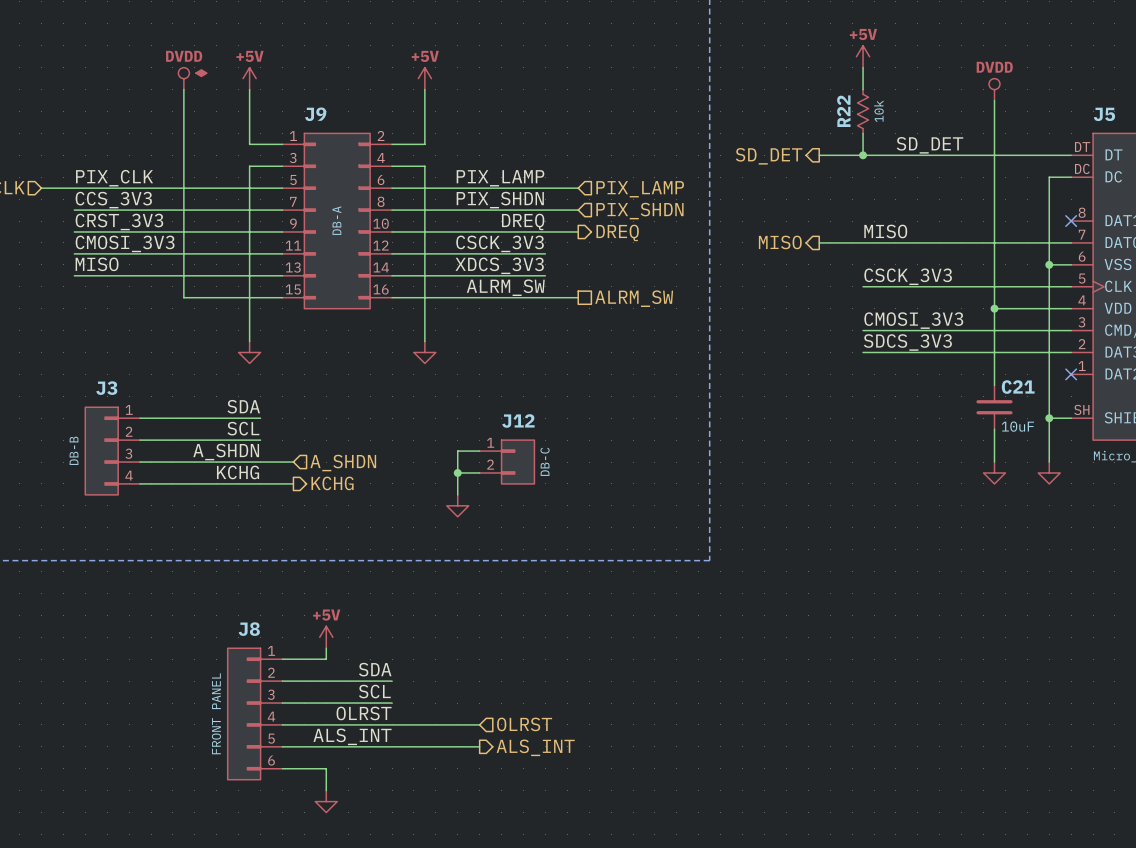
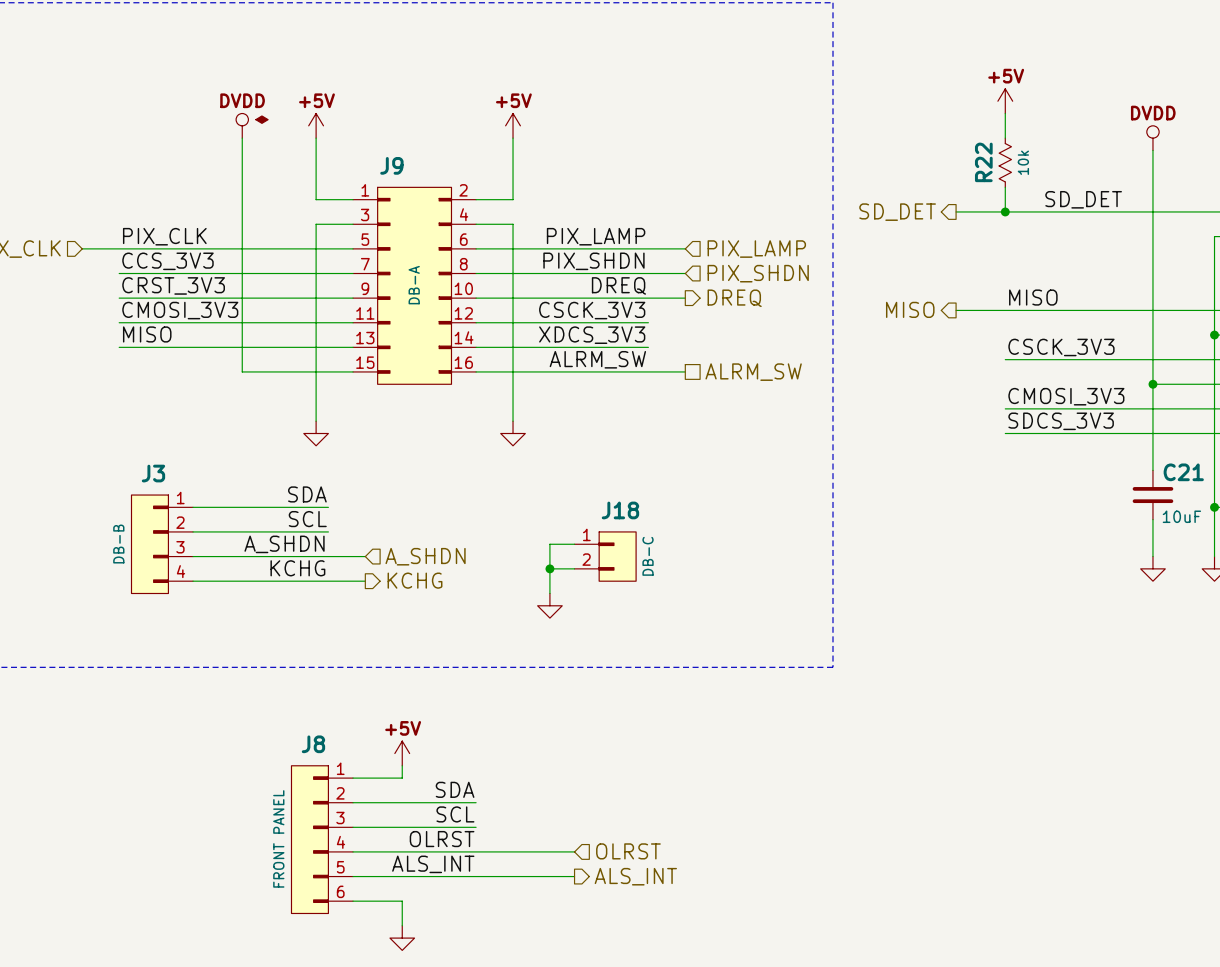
J12 name: J12 (518, 420) -> J18 (620, 510)

